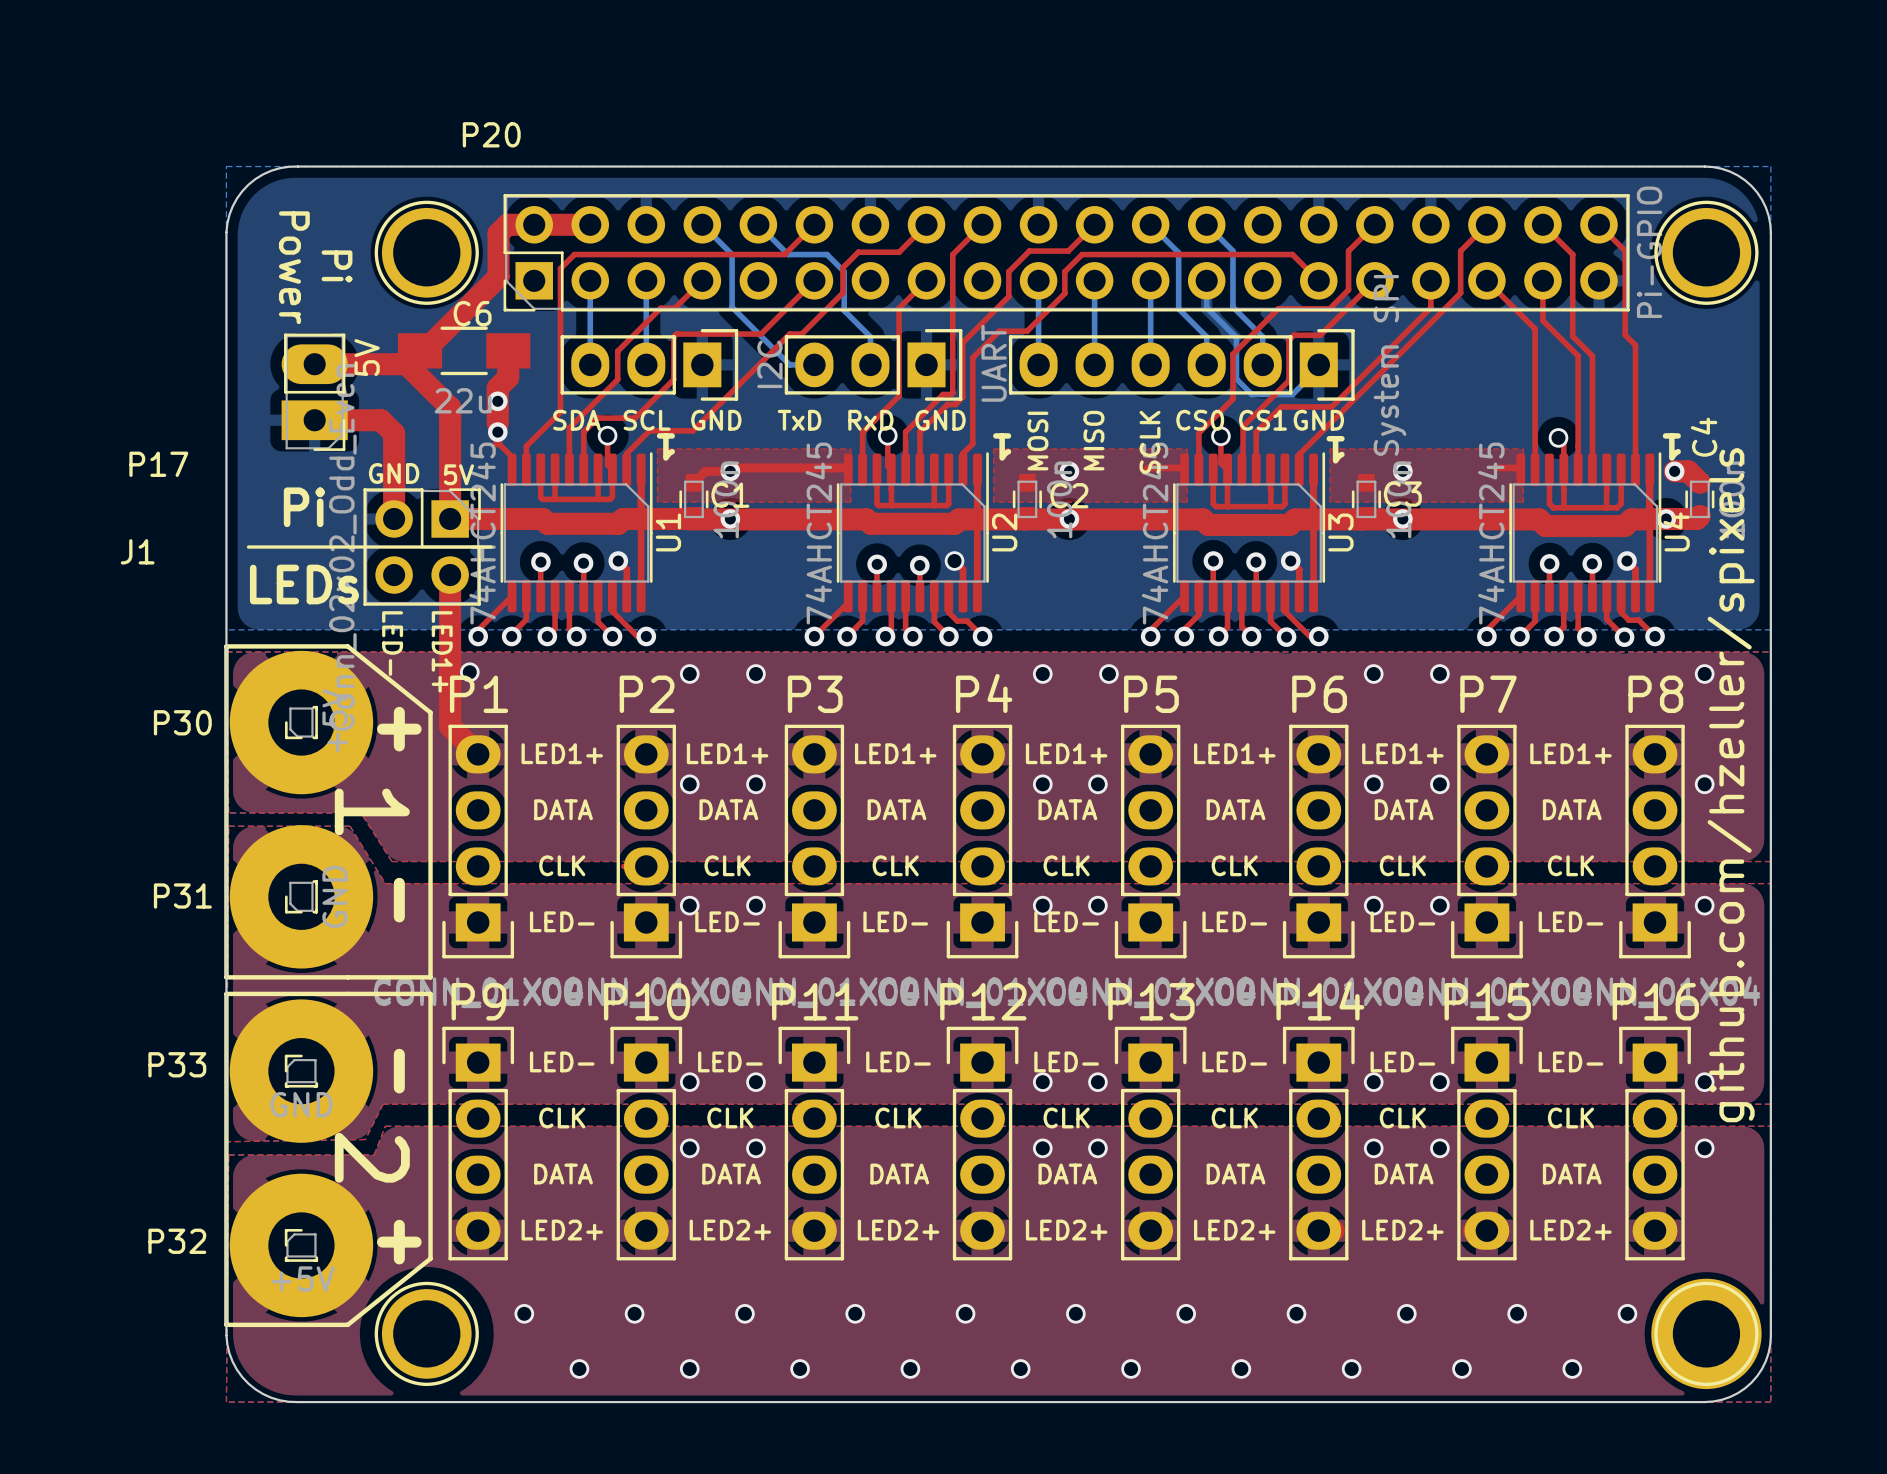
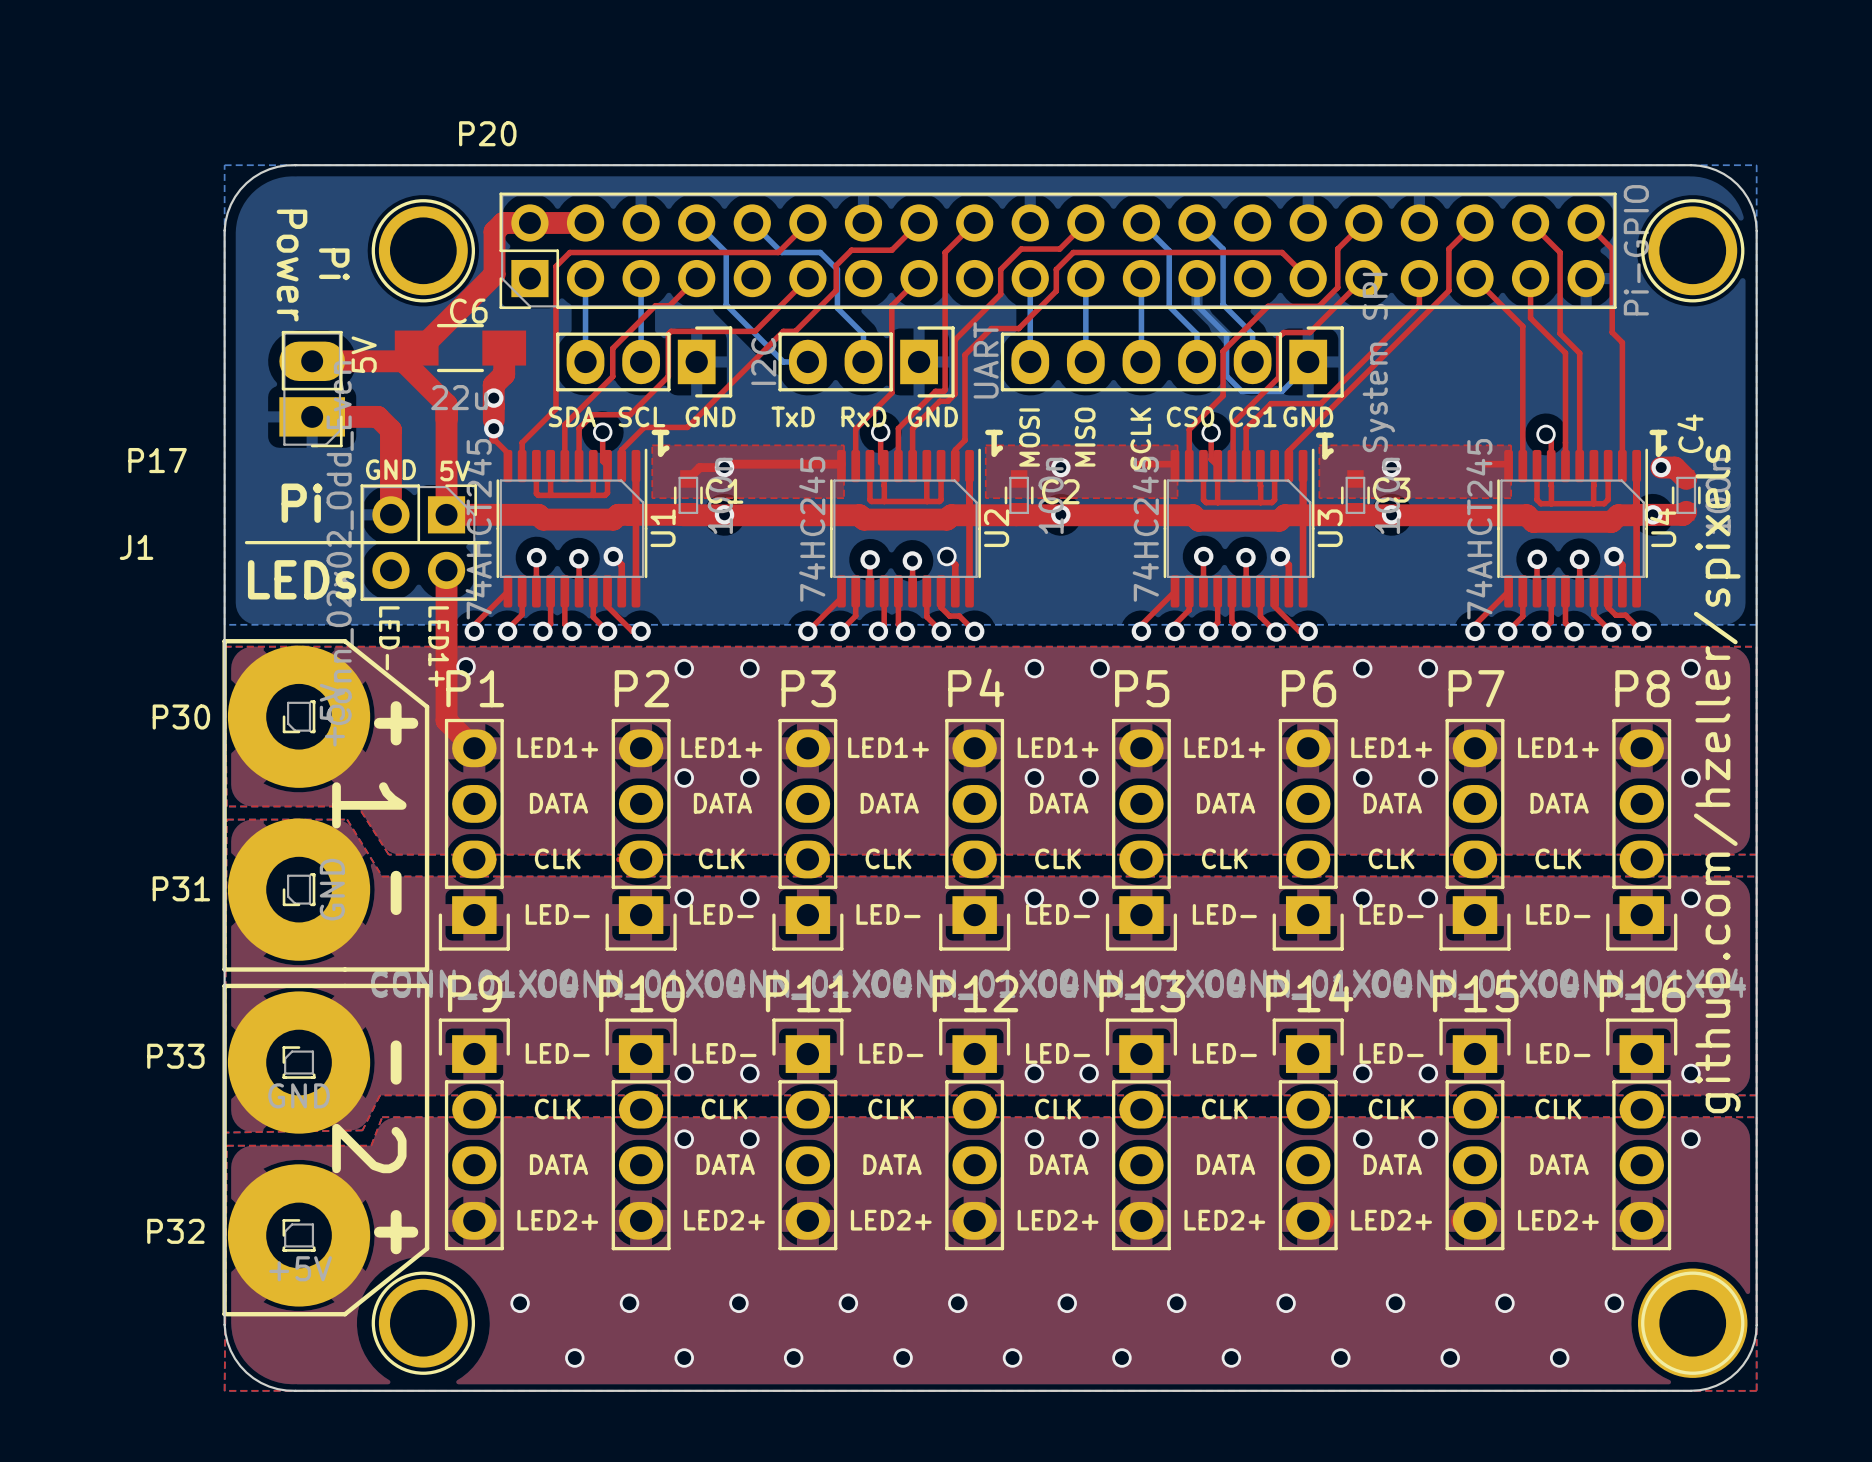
U2 value: 74AHCT245 (818, 533) -> 74HC245 (812, 529)
U3 value: 74AHCT245 (1155, 533) -> 74HC245 (1145, 529)

